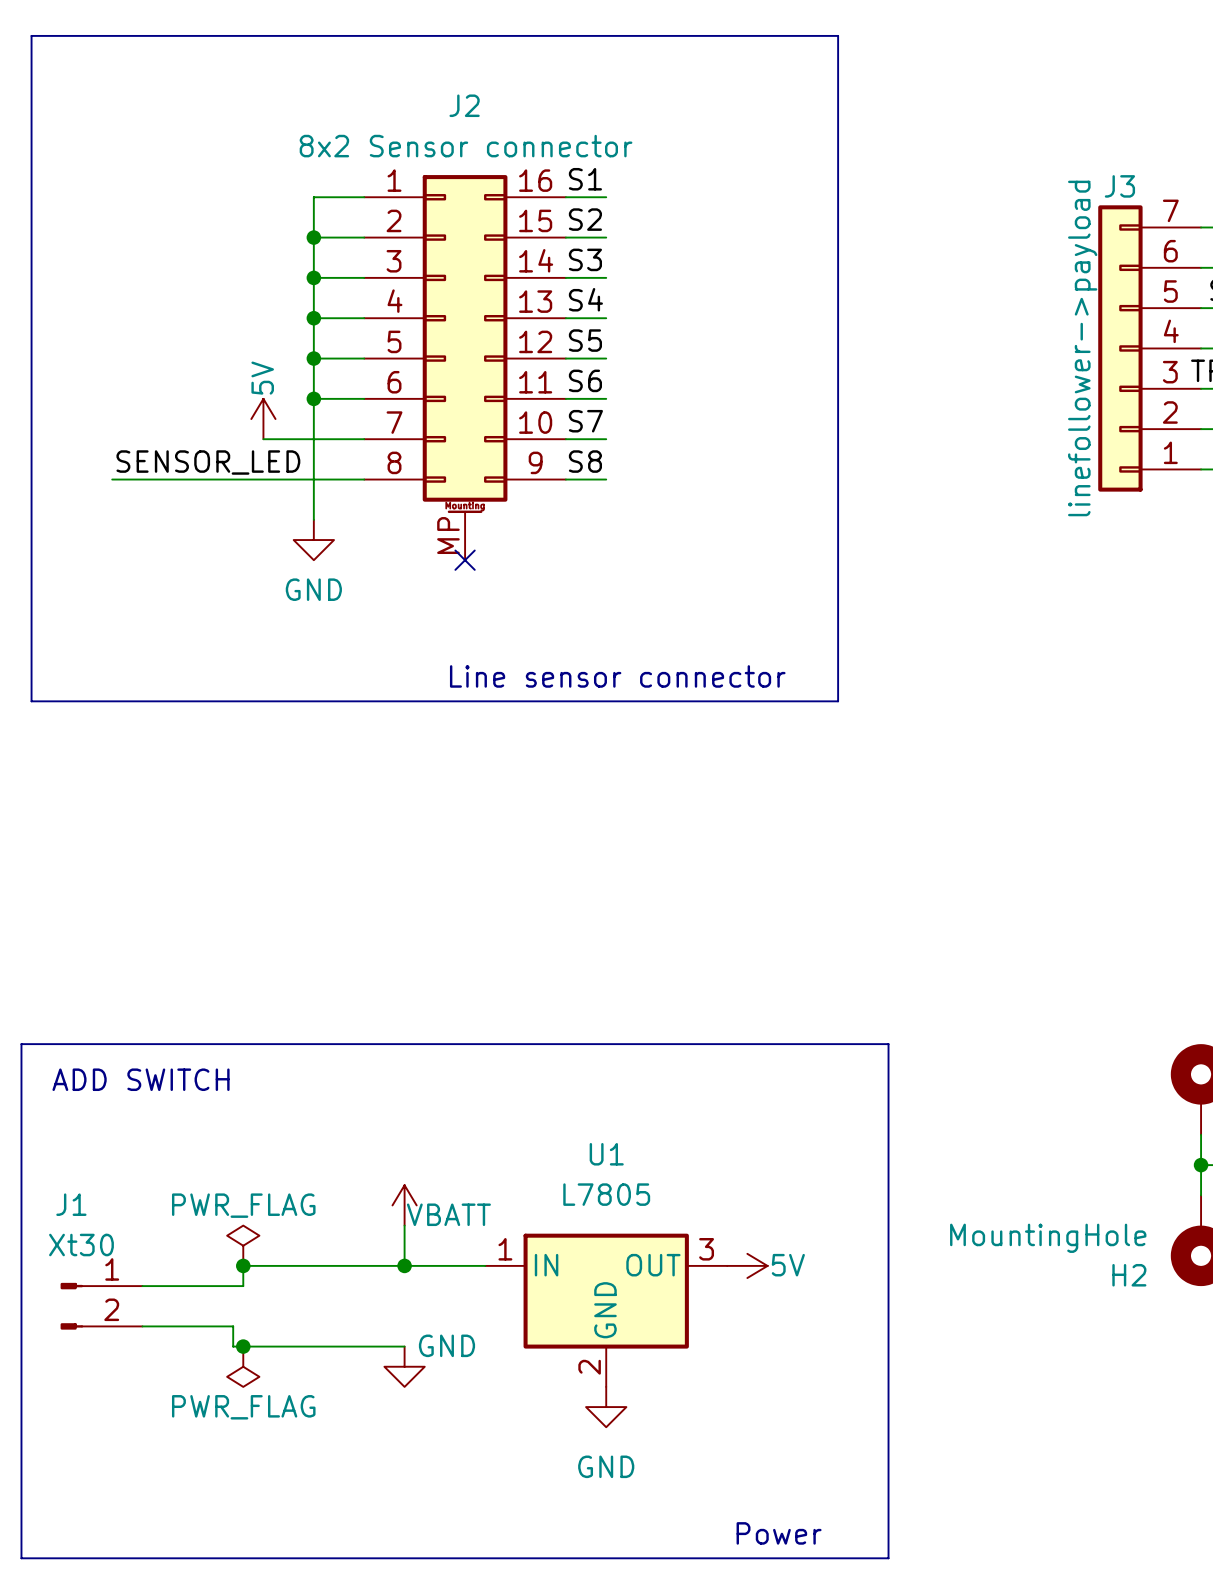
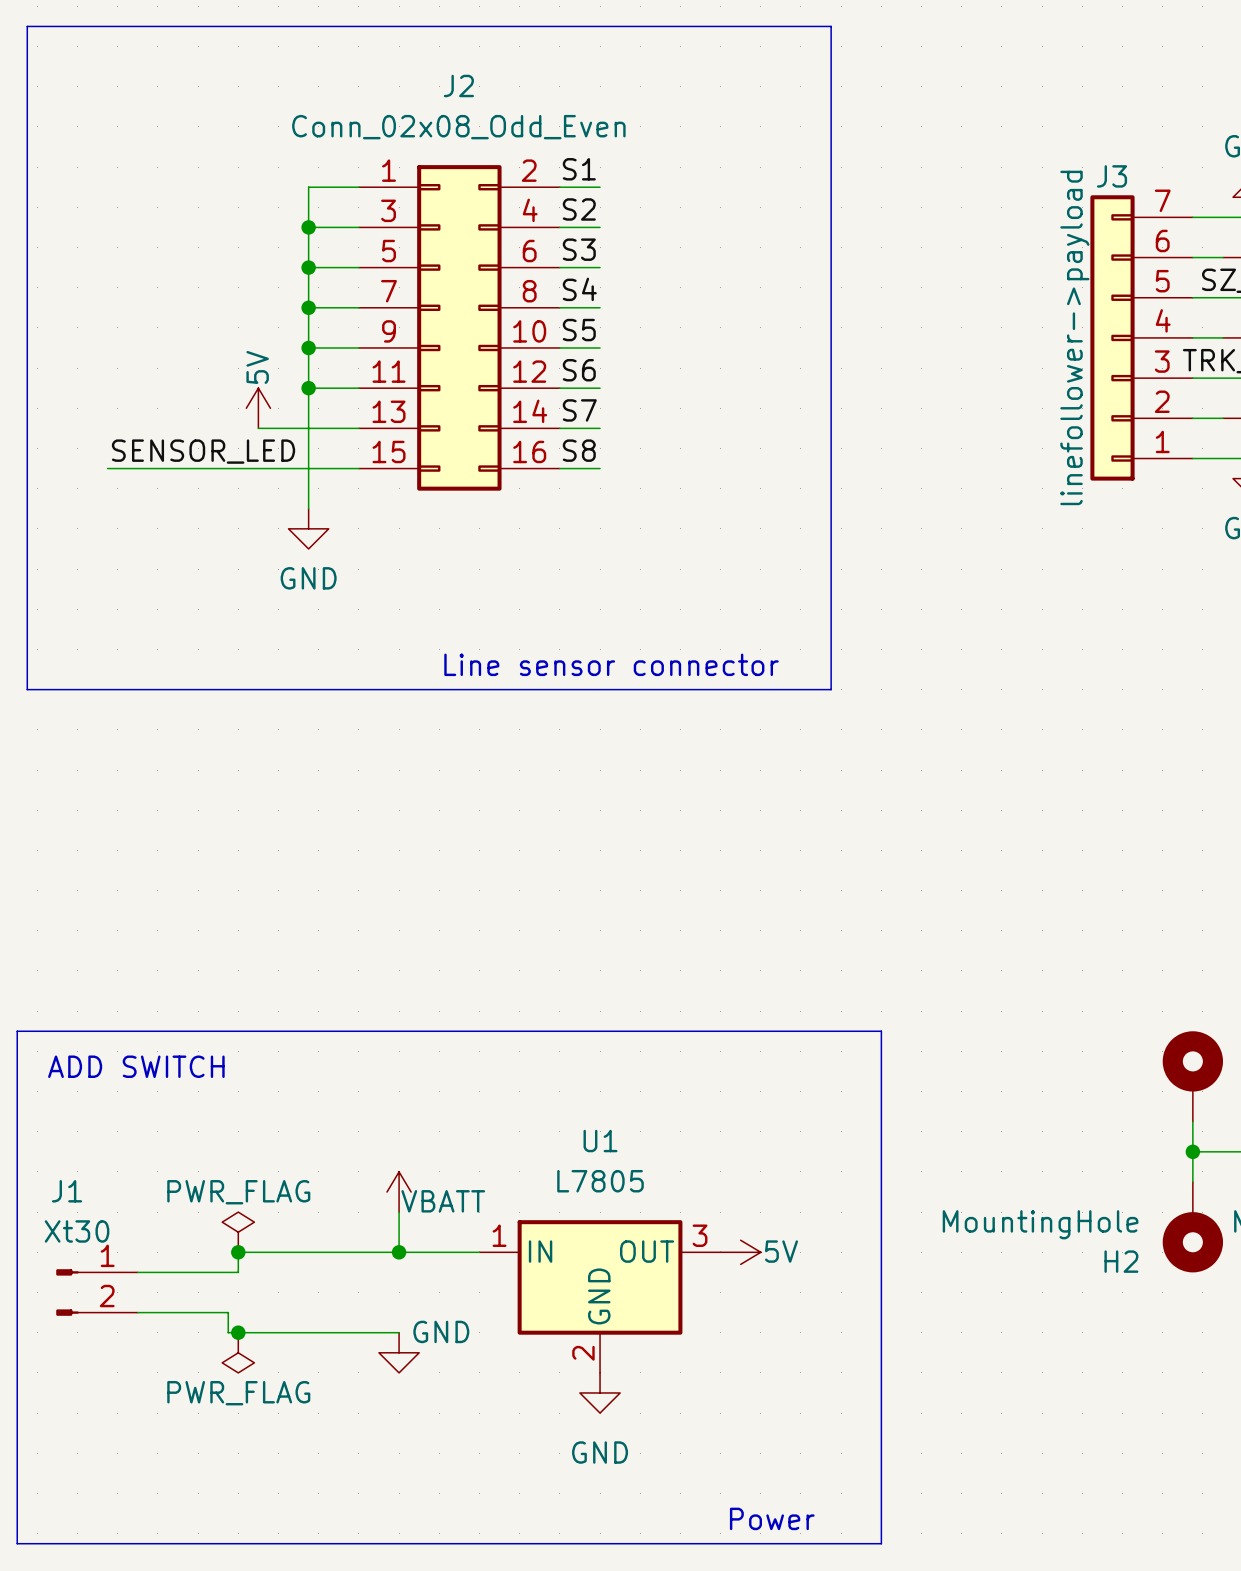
J2 value: 8x2 Sensor connector (466, 146) -> Conn_02x08_Odd_Even (458, 127)
J2 symbol: [364, 175, 566, 561] -> [358, 165, 560, 491]
no-connect mark: (465, 560) -> none

